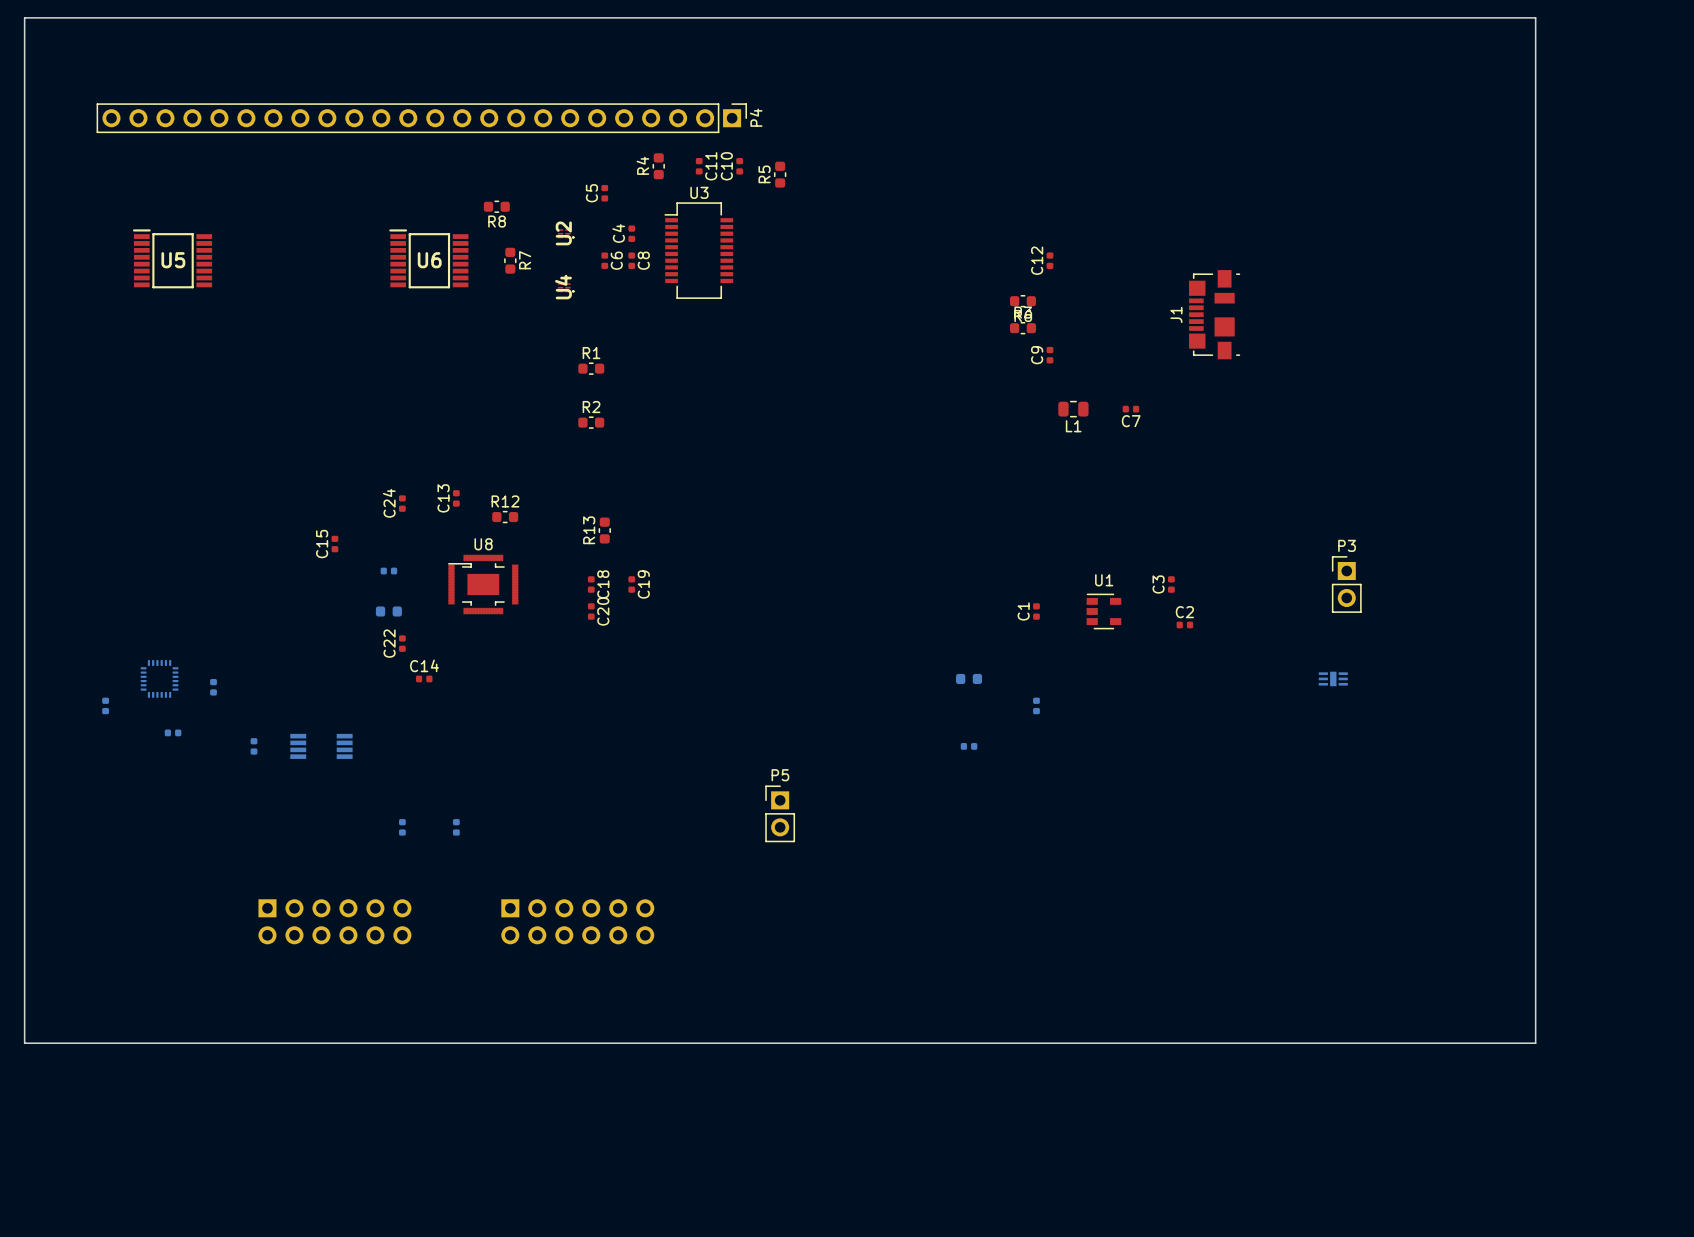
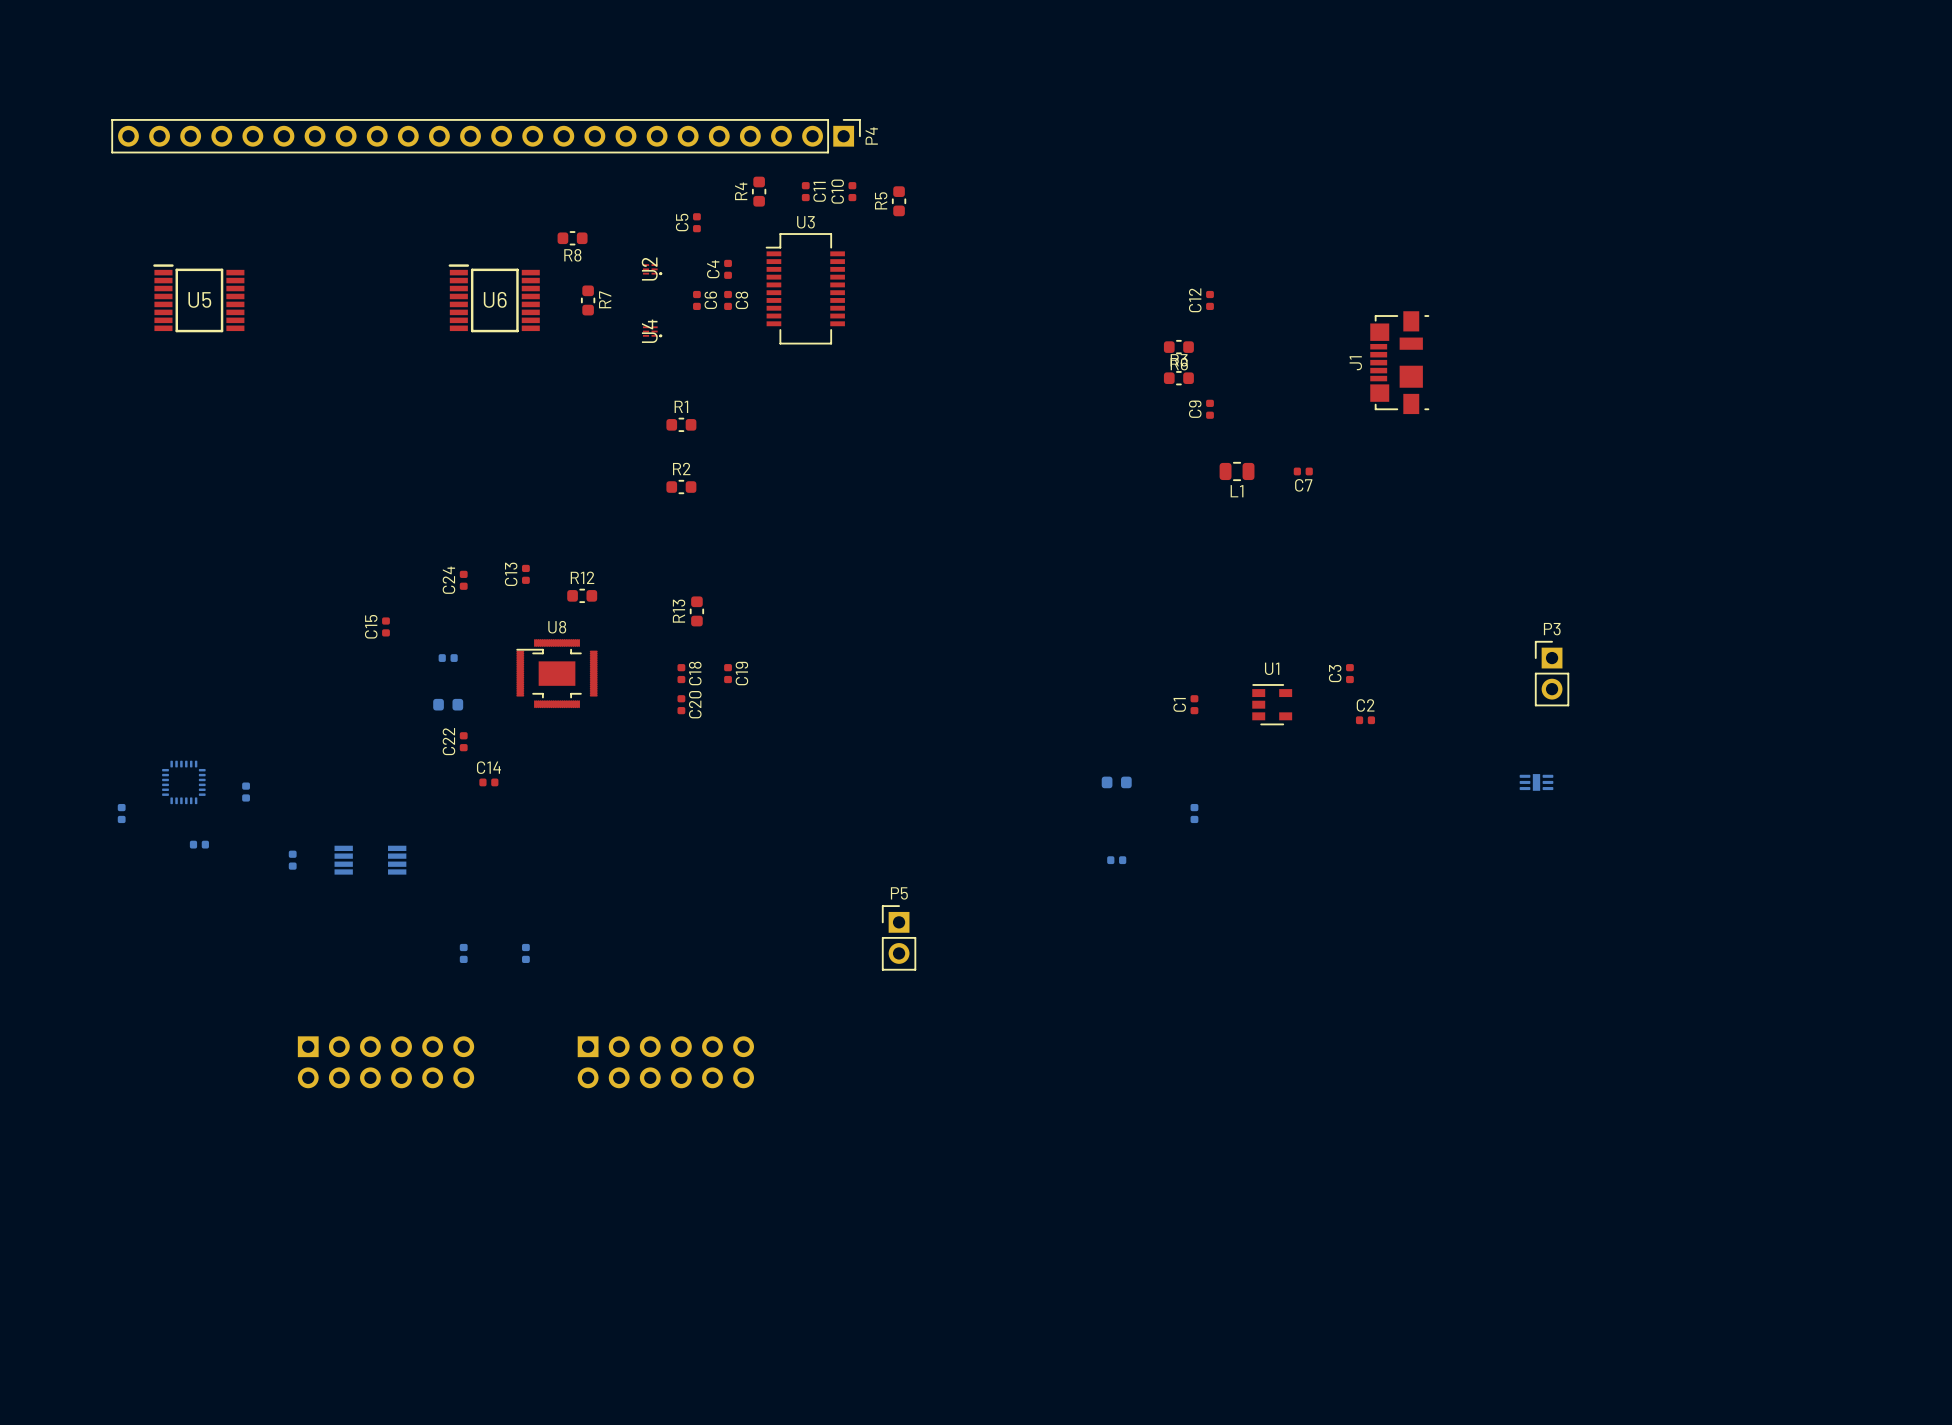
board edge: (24, 17) (1535, 17) (1535, 1043) (24, 1043) (24, 17) -> none

